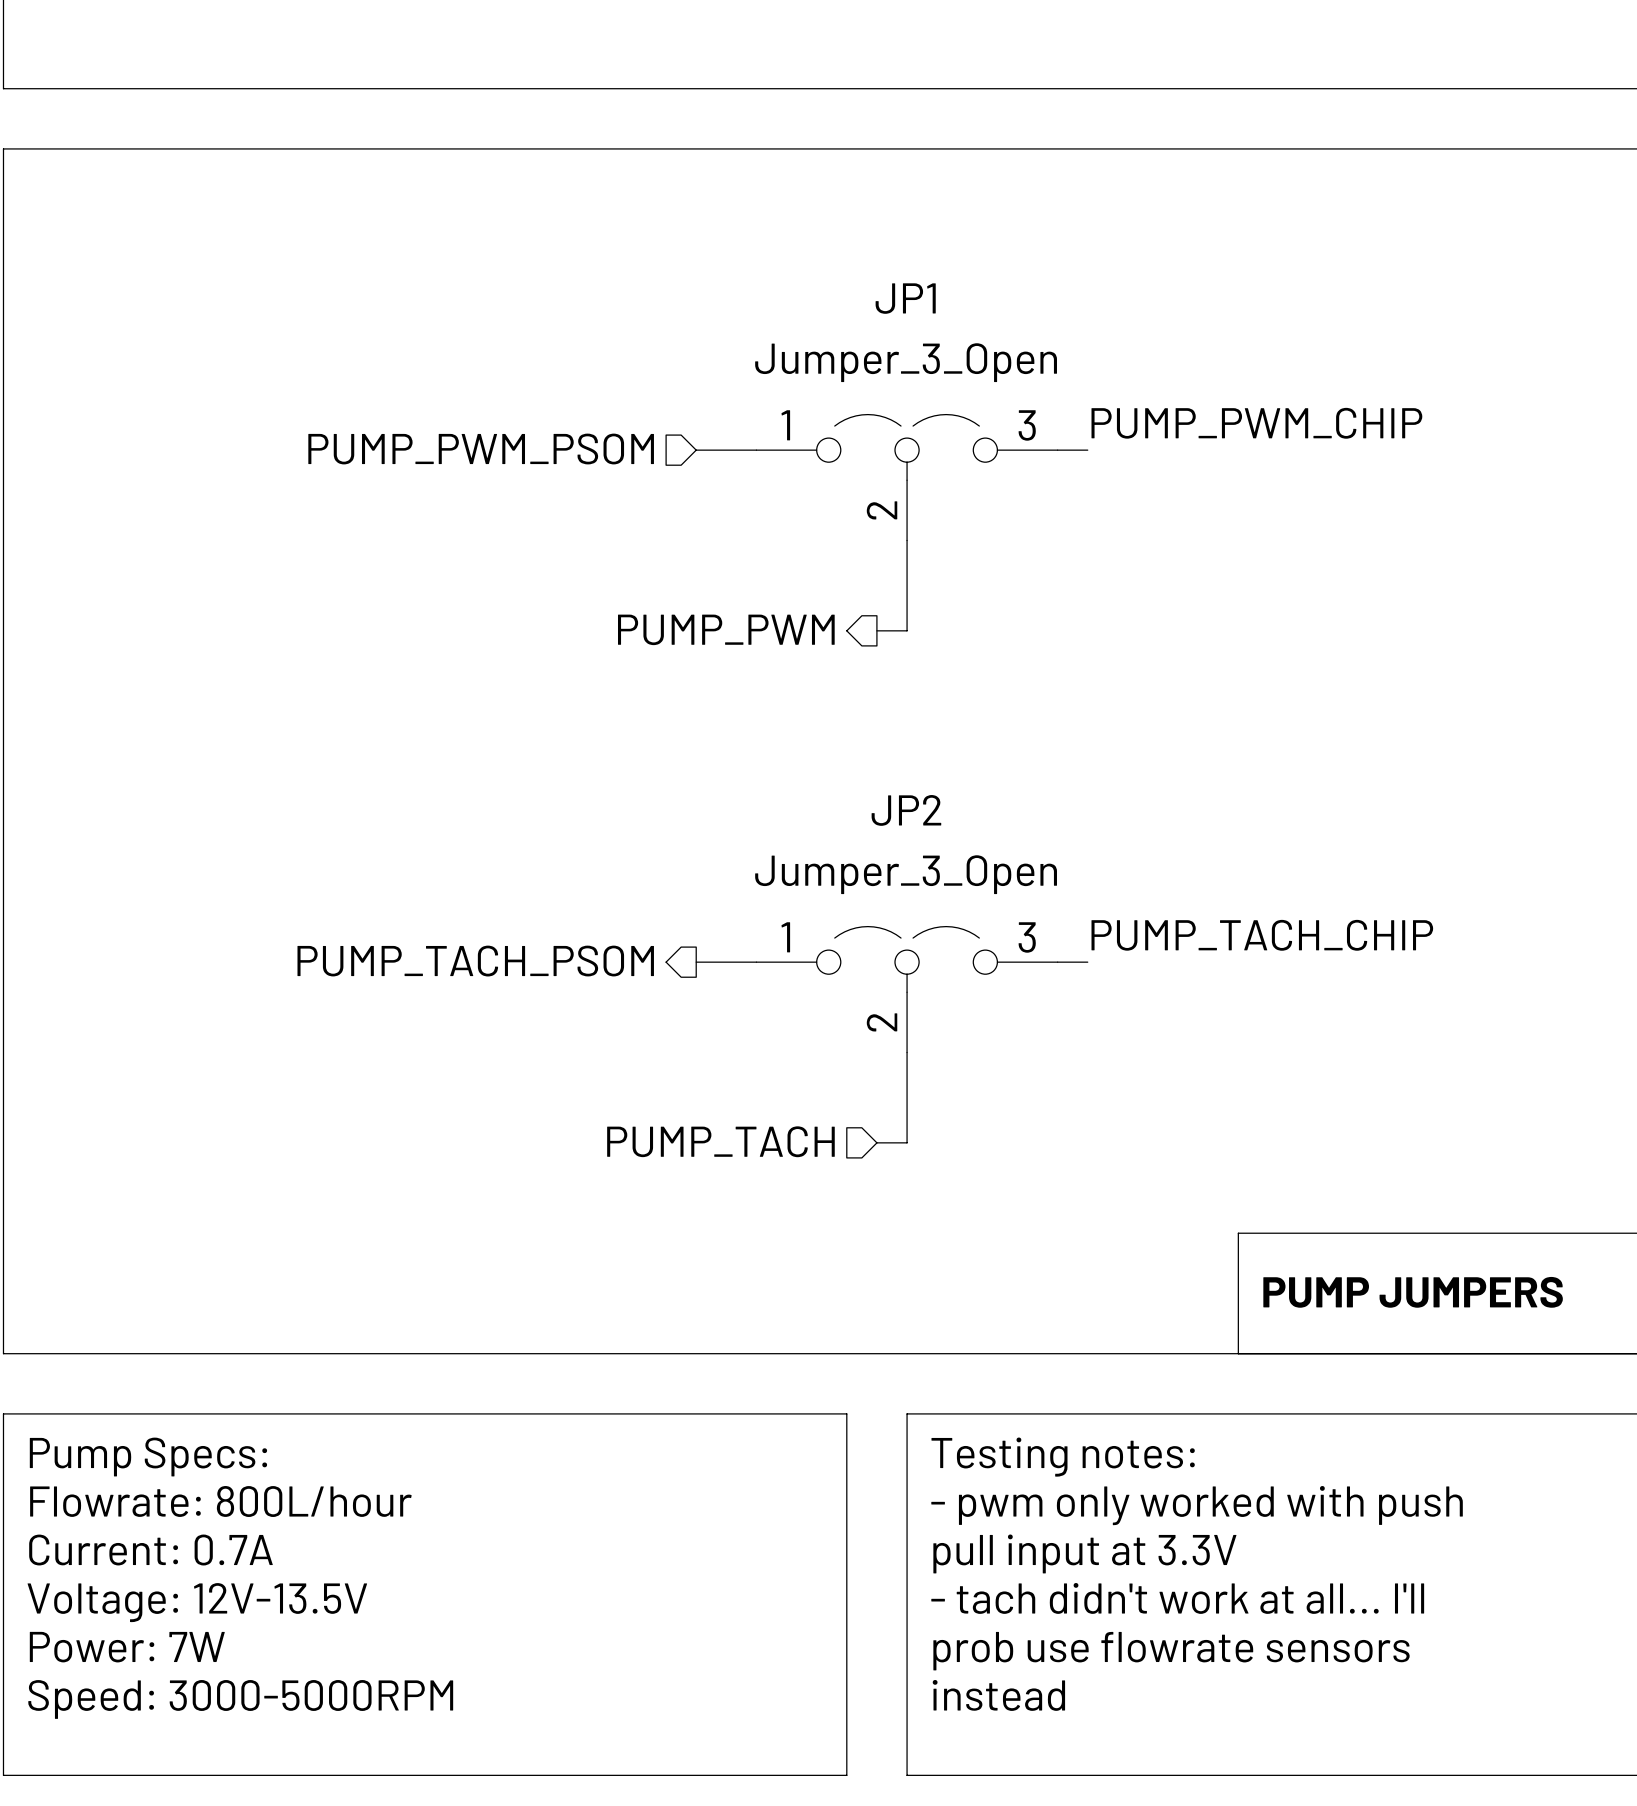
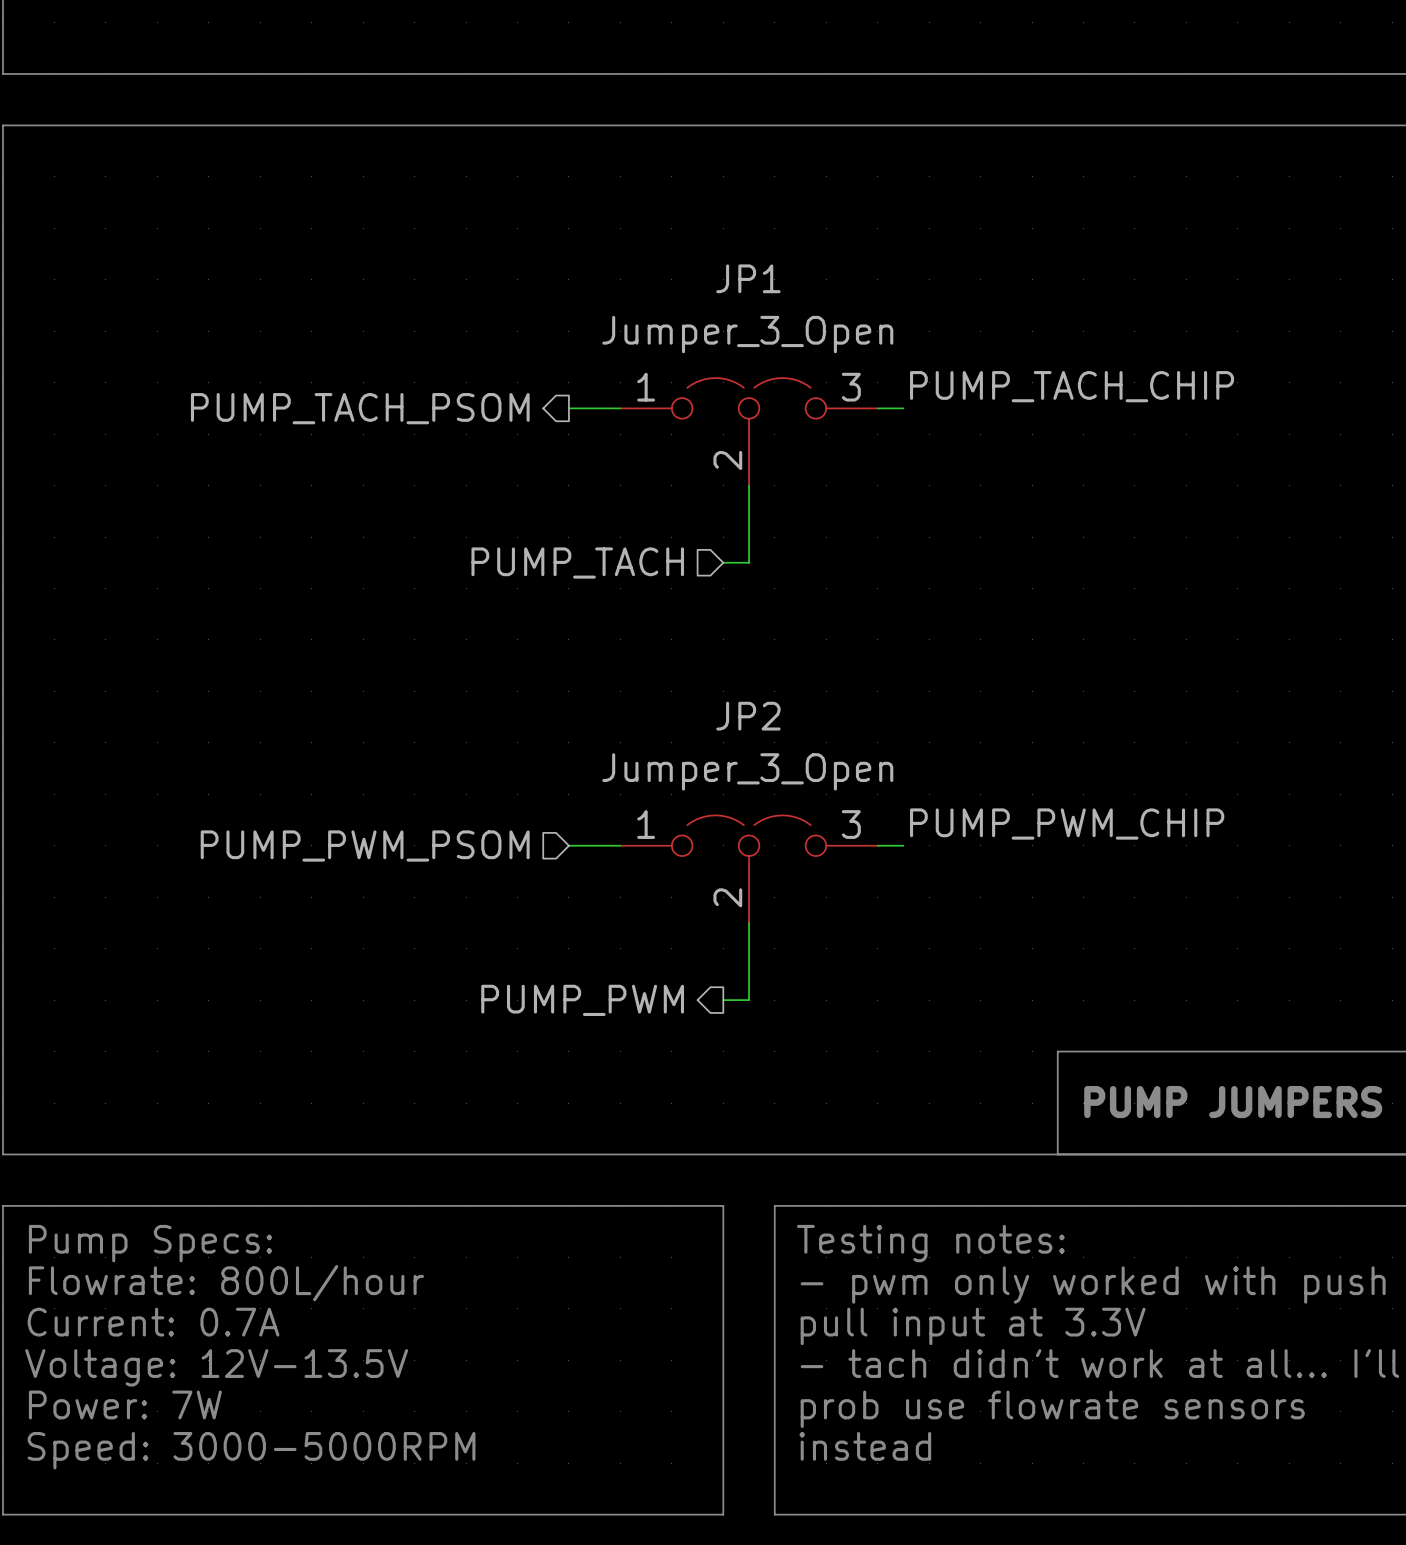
label position: PUMP_PWM_CHIP (1256, 423) -> PUMP_PWM_CHIP (1067, 824)
hierarchical label position: PUMP_PWM_PSOM (481, 449) -> PUMP_PWM_PSOM (365, 846)
wire: (696, 450) (756, 450) -> (568, 408) (620, 408)
wire: (1057, 450) (1087, 450) -> (877, 408) (903, 408)
JP1 position: (907, 477) -> (749, 431)
wire: (907, 540) (907, 630) (876, 630) -> (749, 485) (749, 562) (723, 562)
hierarchical label position: PUMP_PWM (726, 629) -> PUMP_PWM (582, 1000)
label position: PUMP_TACH_CHIP (1262, 935) -> PUMP_TACH_CHIP (1072, 386)
hierarchical label position: PUMP_TACH_PSOM (475, 961) -> PUMP_TACH_PSOM (360, 408)
wire: (696, 962) (756, 962) -> (568, 845) (620, 845)
wire: (1057, 962) (1087, 962) -> (877, 845) (903, 845)
JP2 position: (907, 989) -> (749, 869)
wire: (907, 1052) (907, 1142) (876, 1142) -> (749, 922) (749, 1000) (723, 1000)
hierarchical label position: PUMP_TACH (720, 1141) -> PUMP_TACH (577, 563)

